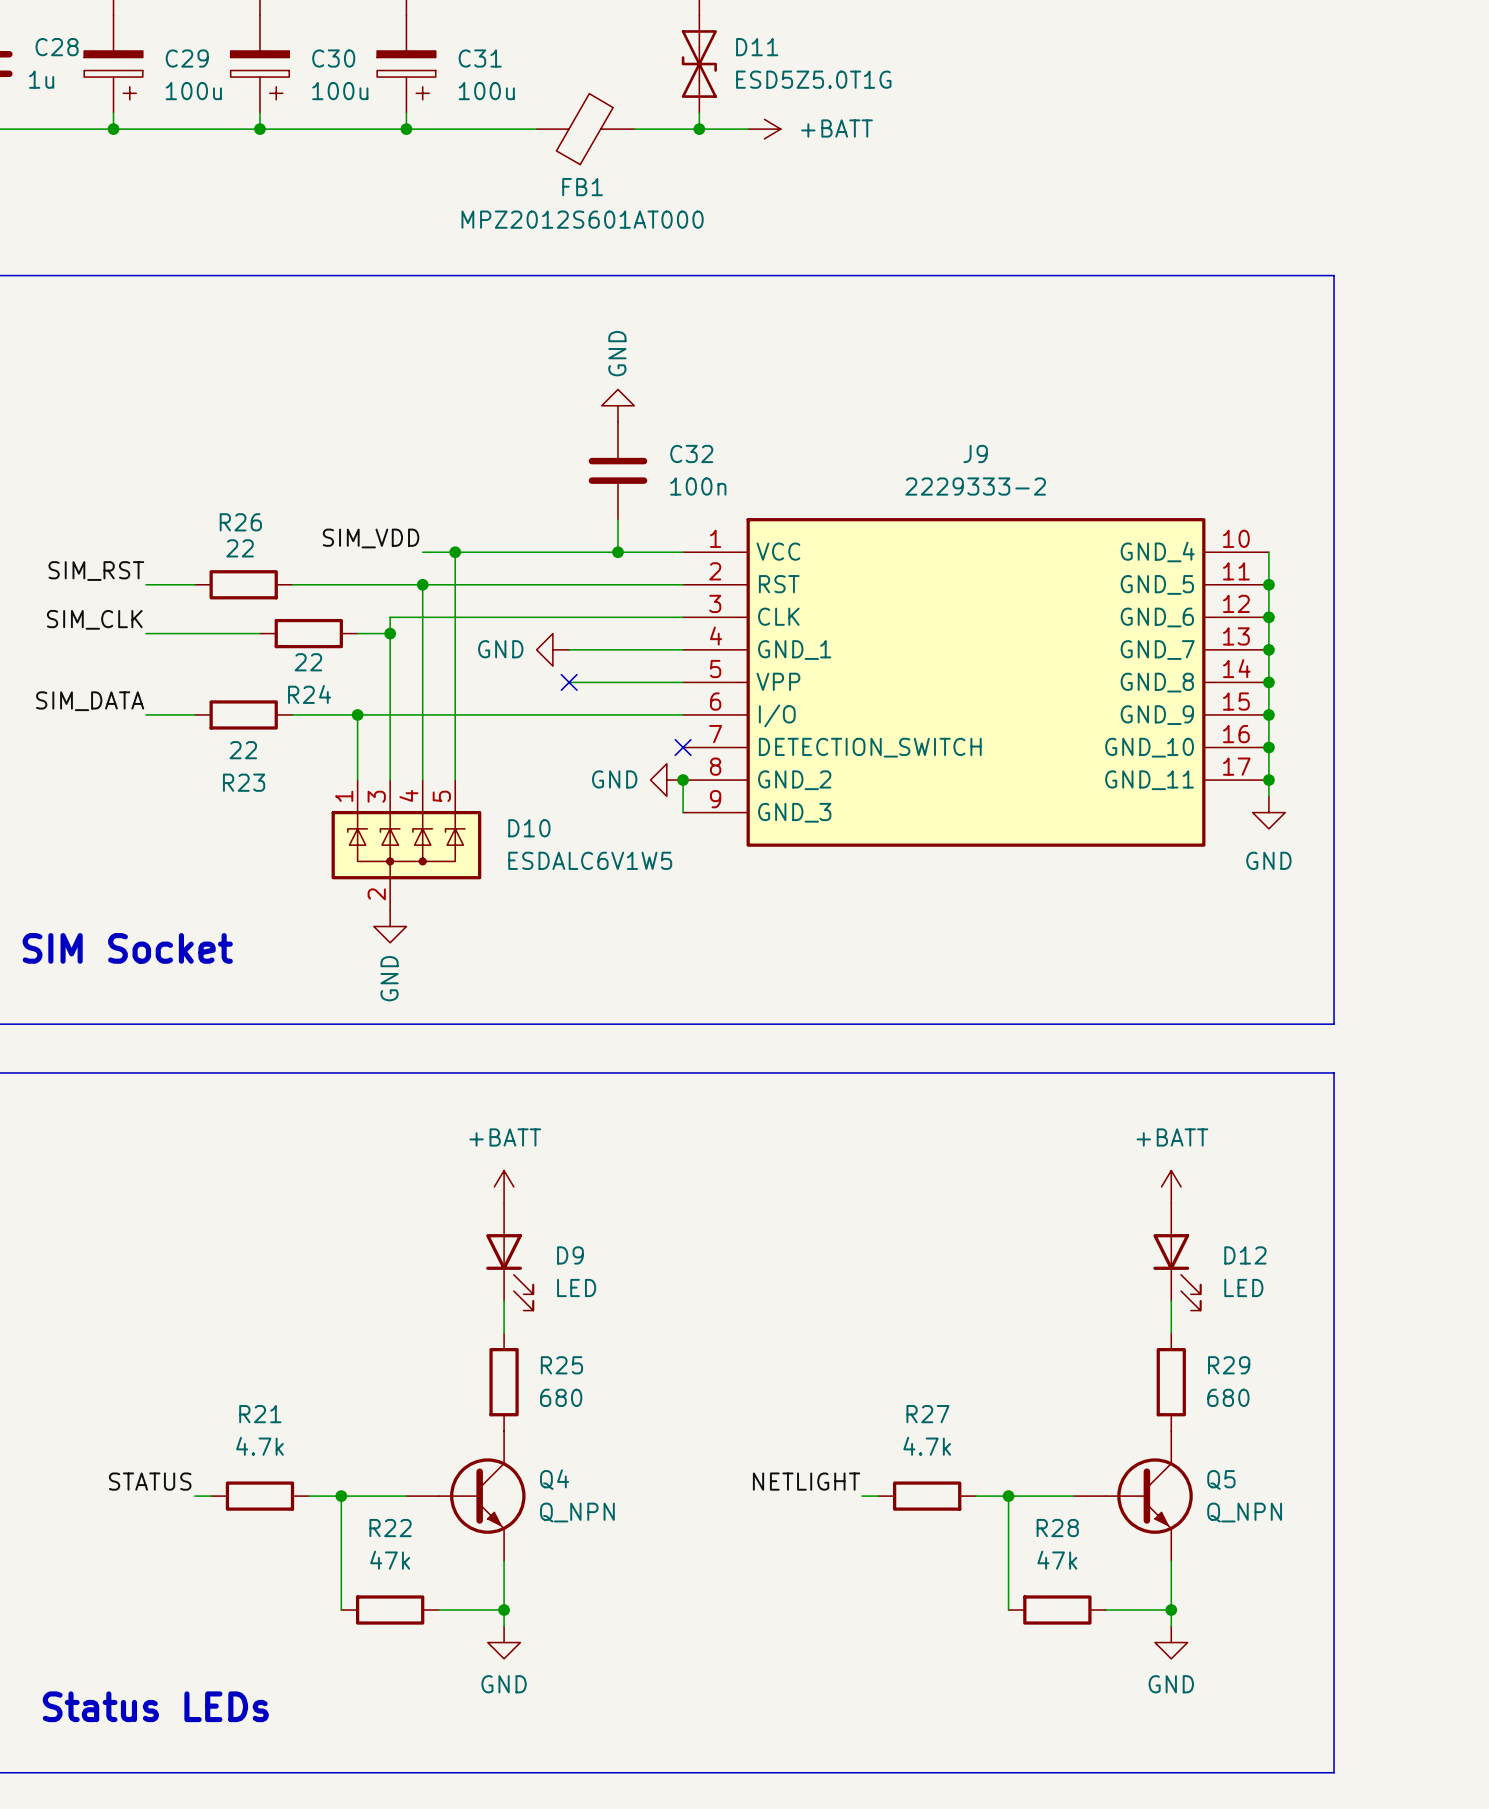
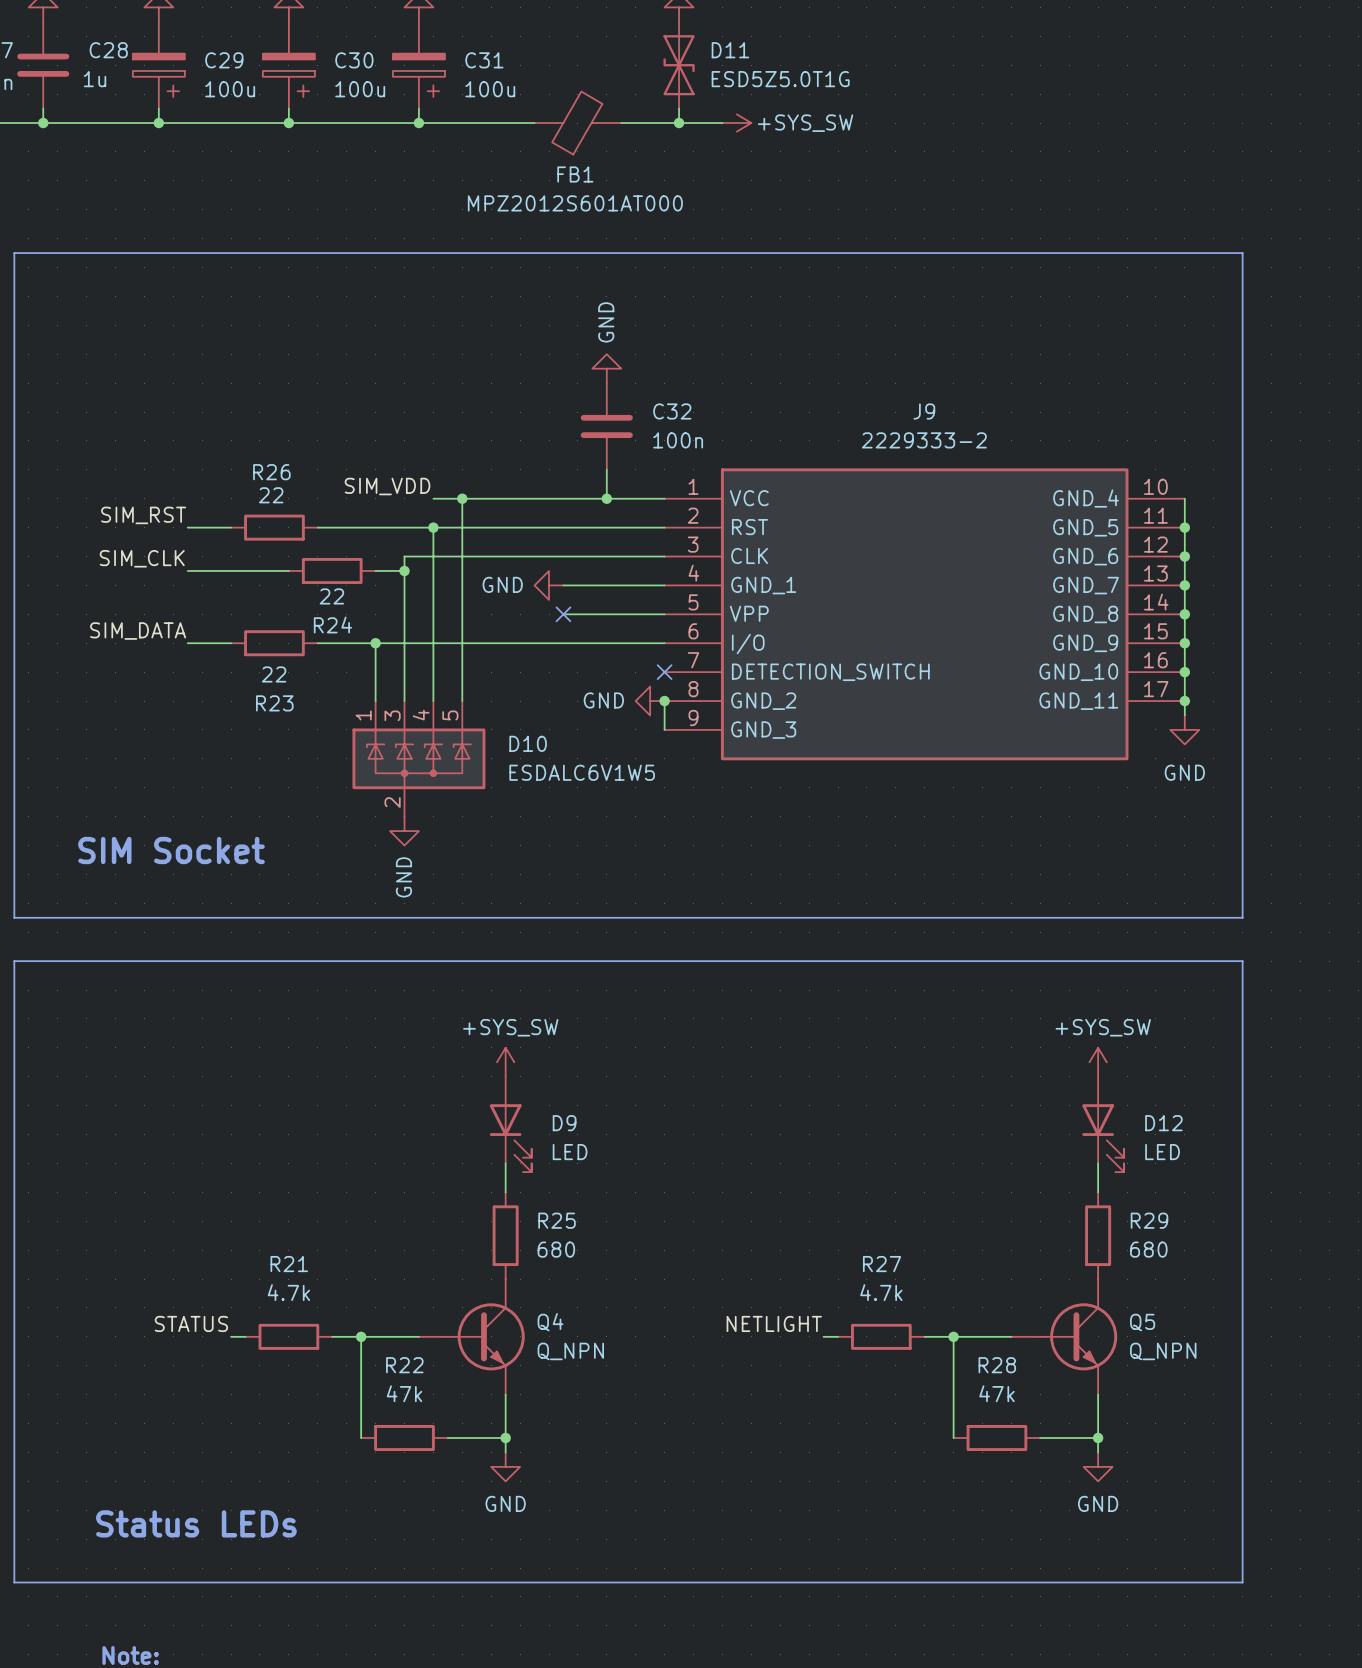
power symbol: +BATT (764, 129) -> +SYS_SW (736, 123)
power symbol: +BATT (504, 1186) -> +SYS_SW (505, 1062)
power symbol: +BATT (1171, 1186) -> +SYS_SW (1098, 1062)

